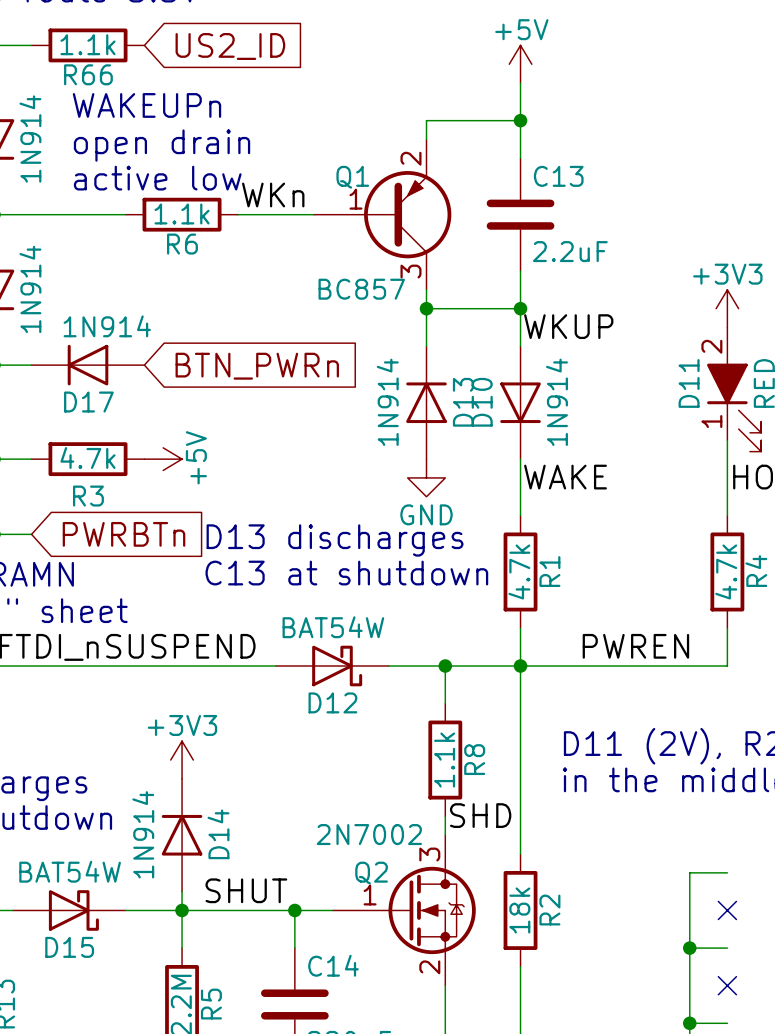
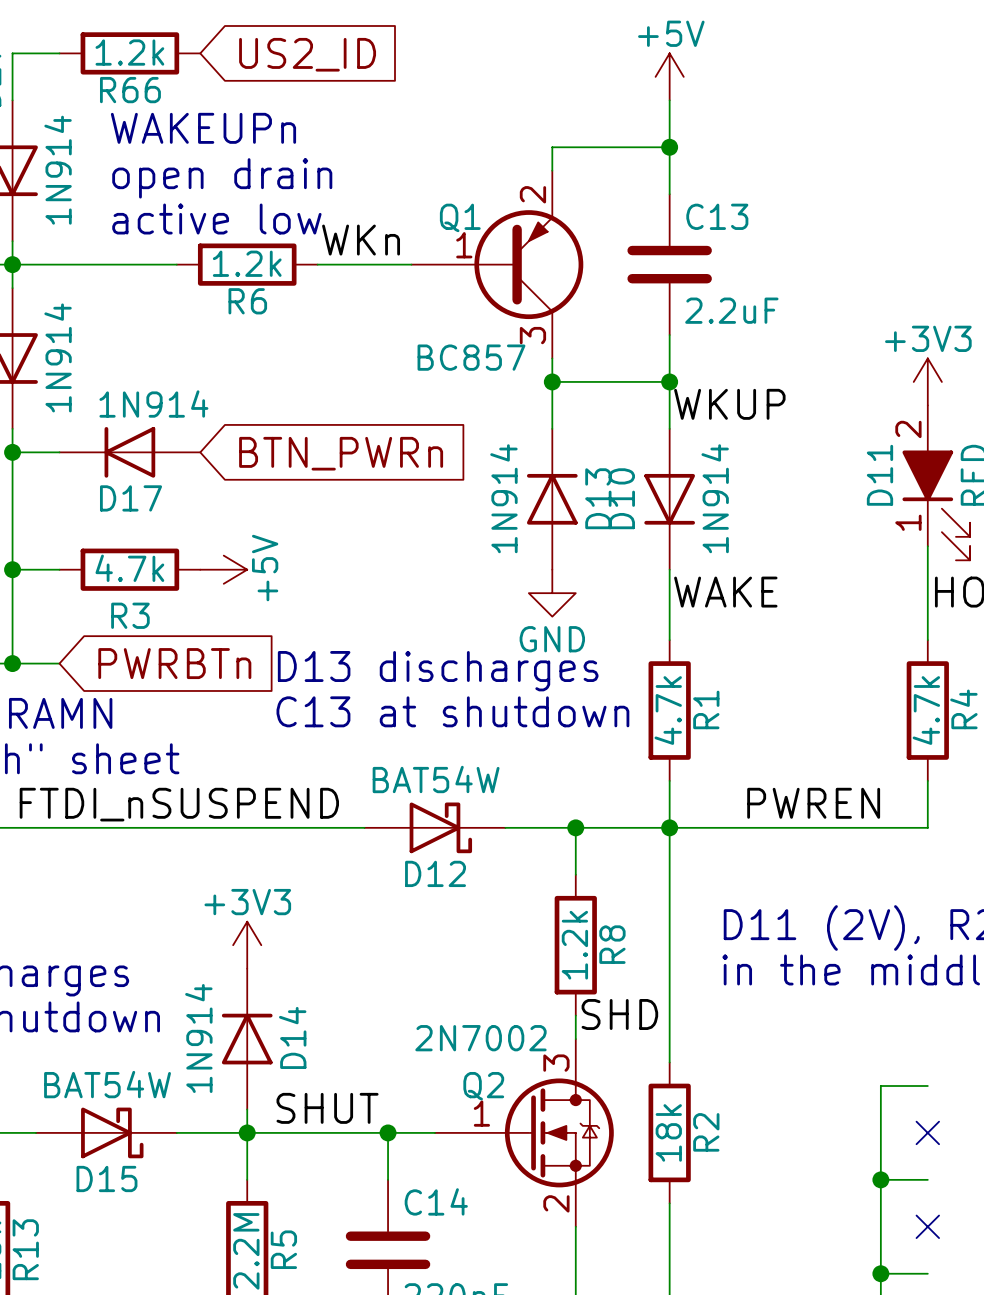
R66 value: 1.1k (88, 44) -> 1.2k (129, 52)
R6 value: 1.1k (182, 213) -> 1.2k (247, 263)
R8 value: 1.1k (444, 760) -> 1.2k (574, 945)

